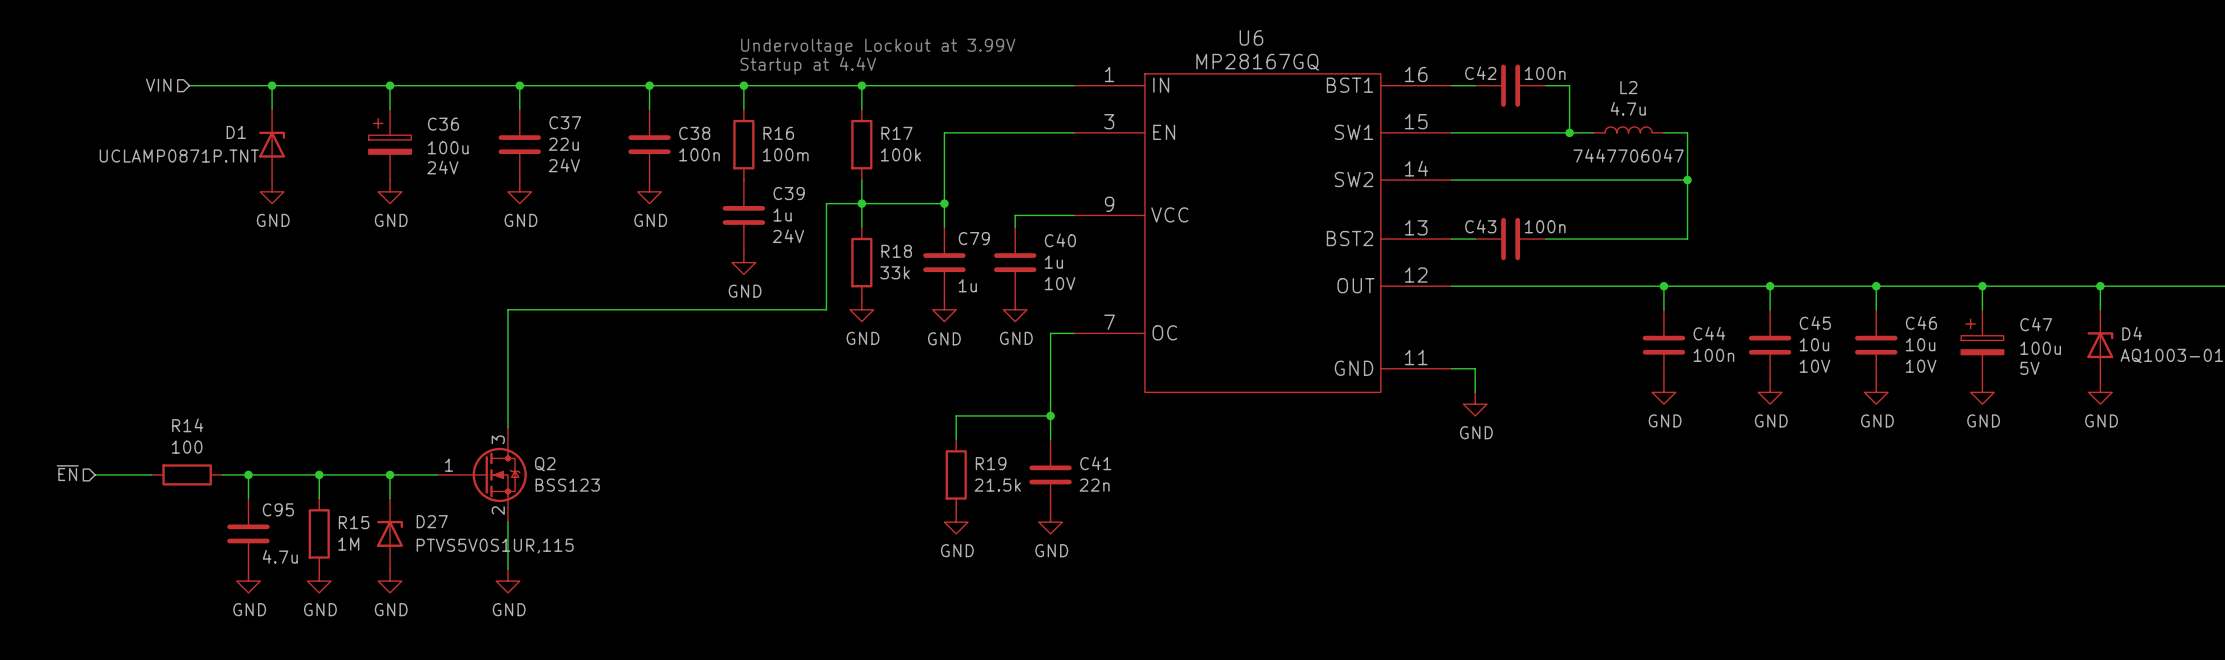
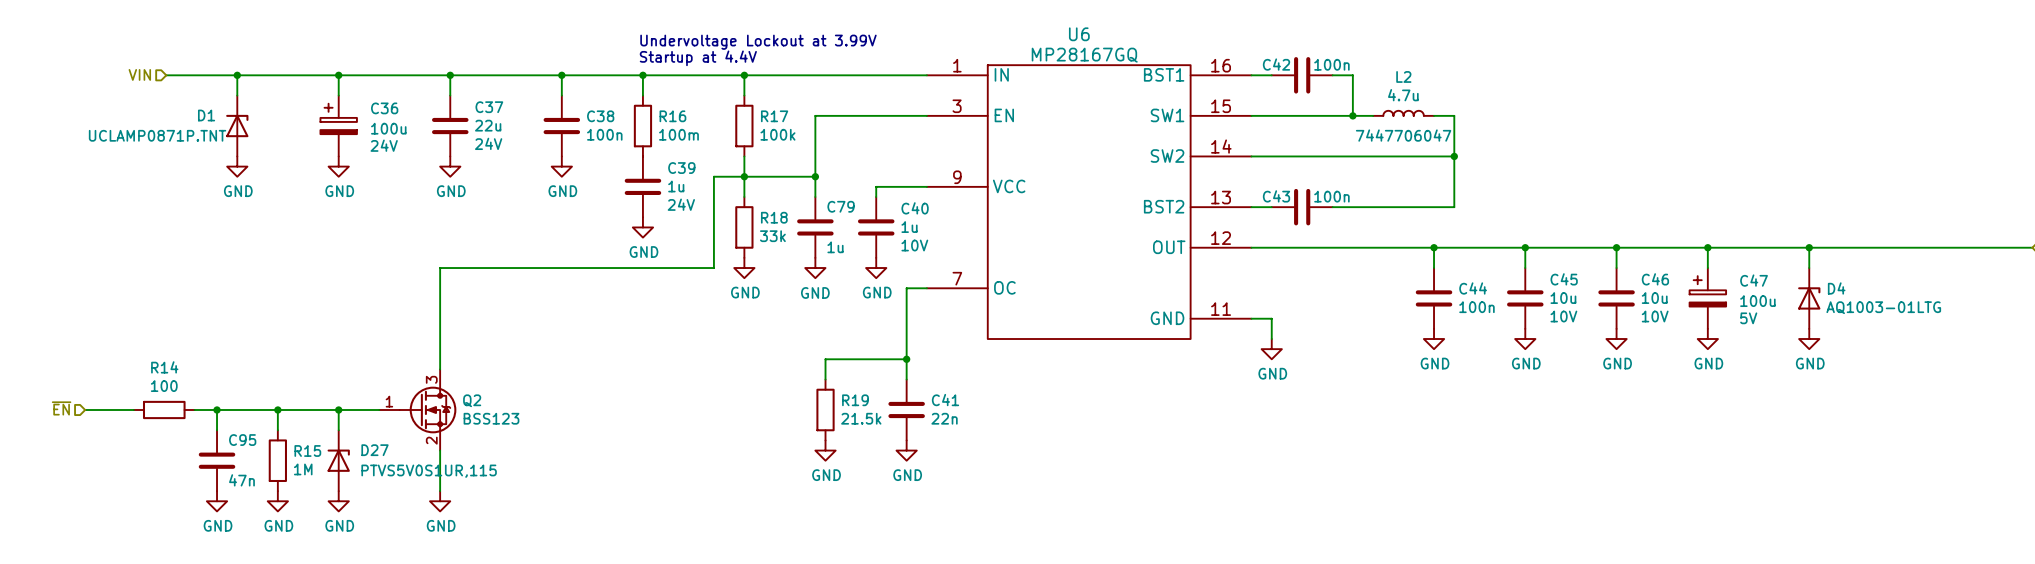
C95 value: 4.7u (280, 556) -> 47n (241, 480)

